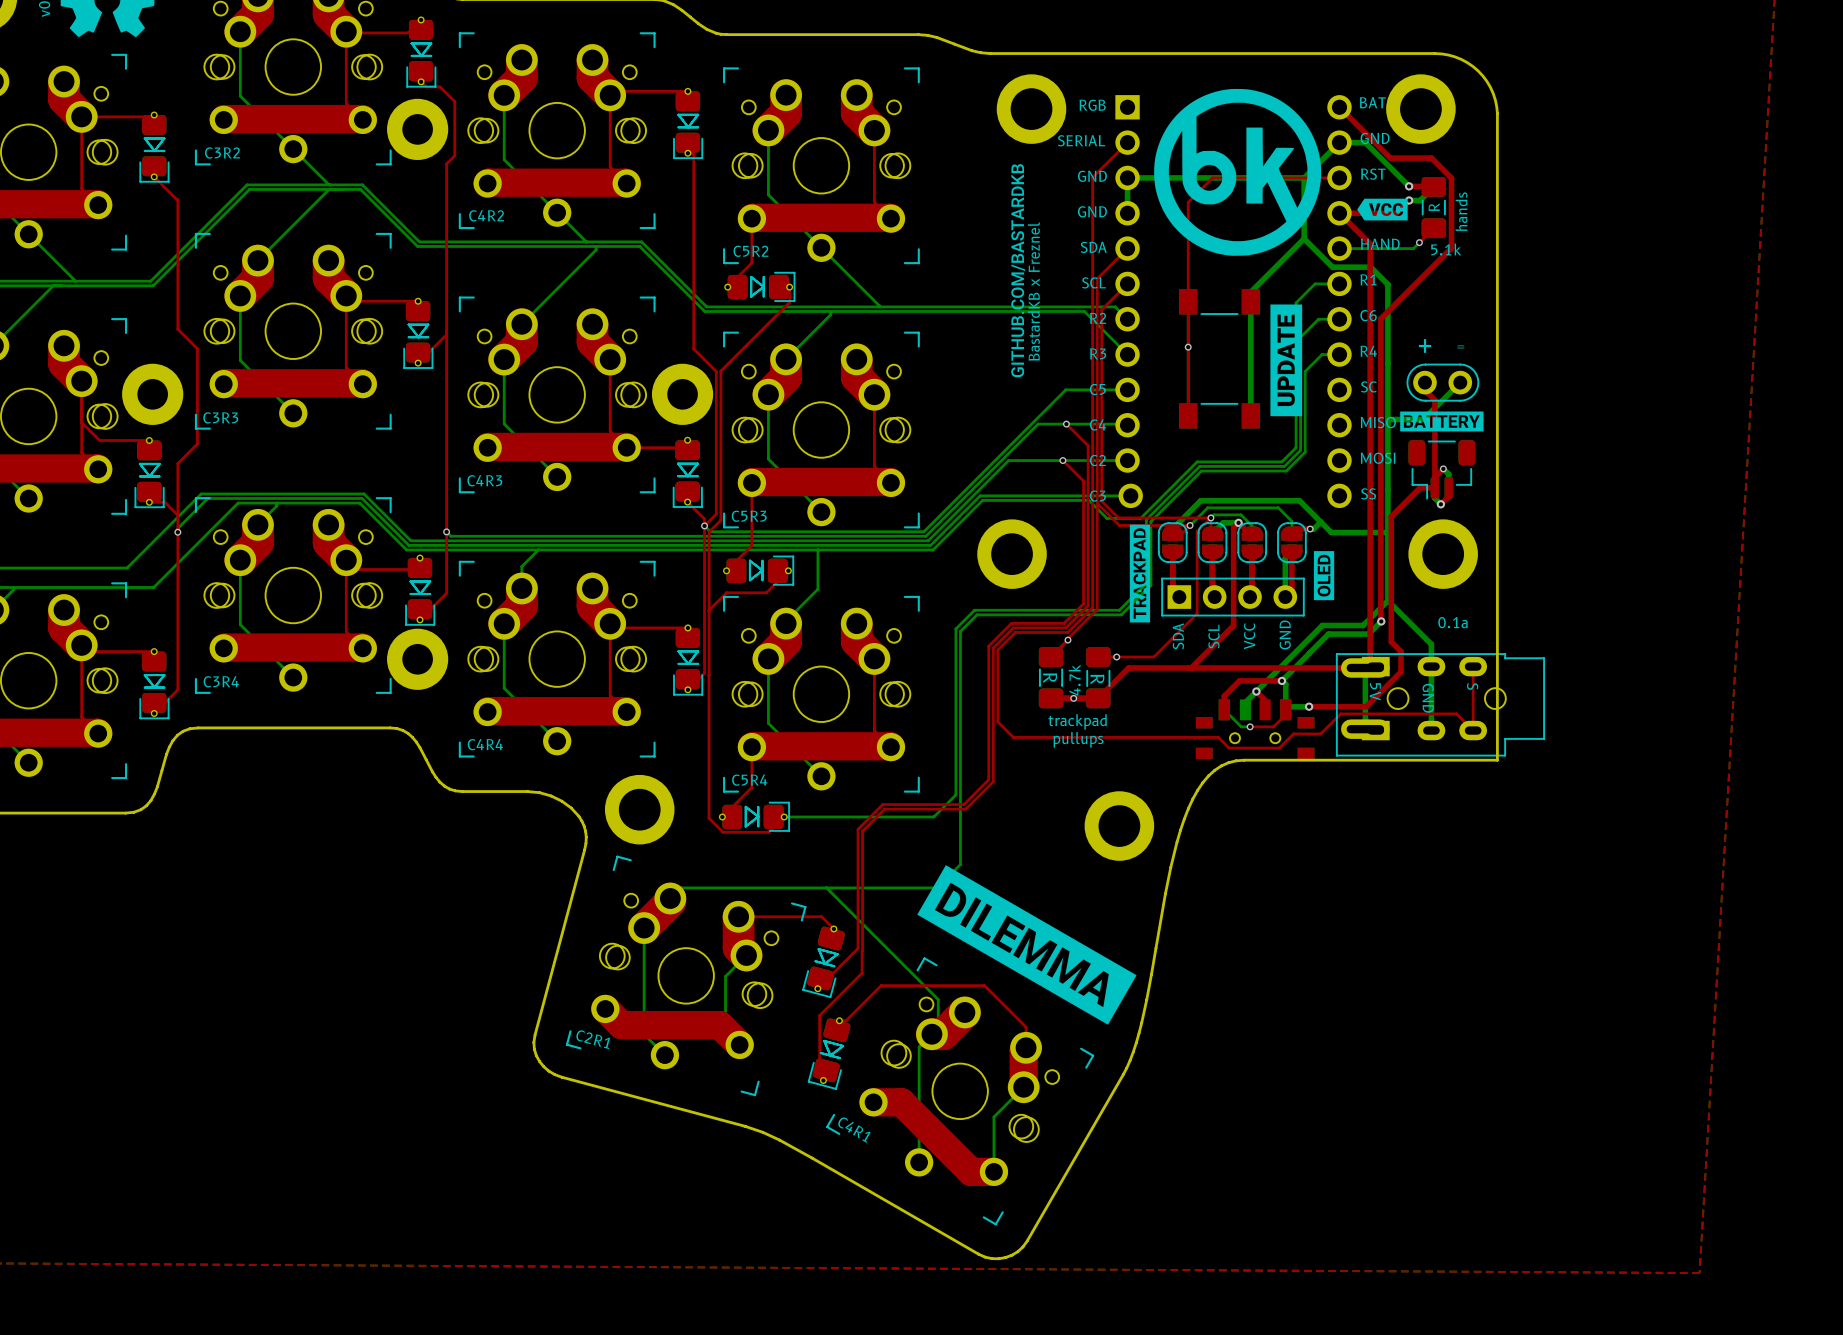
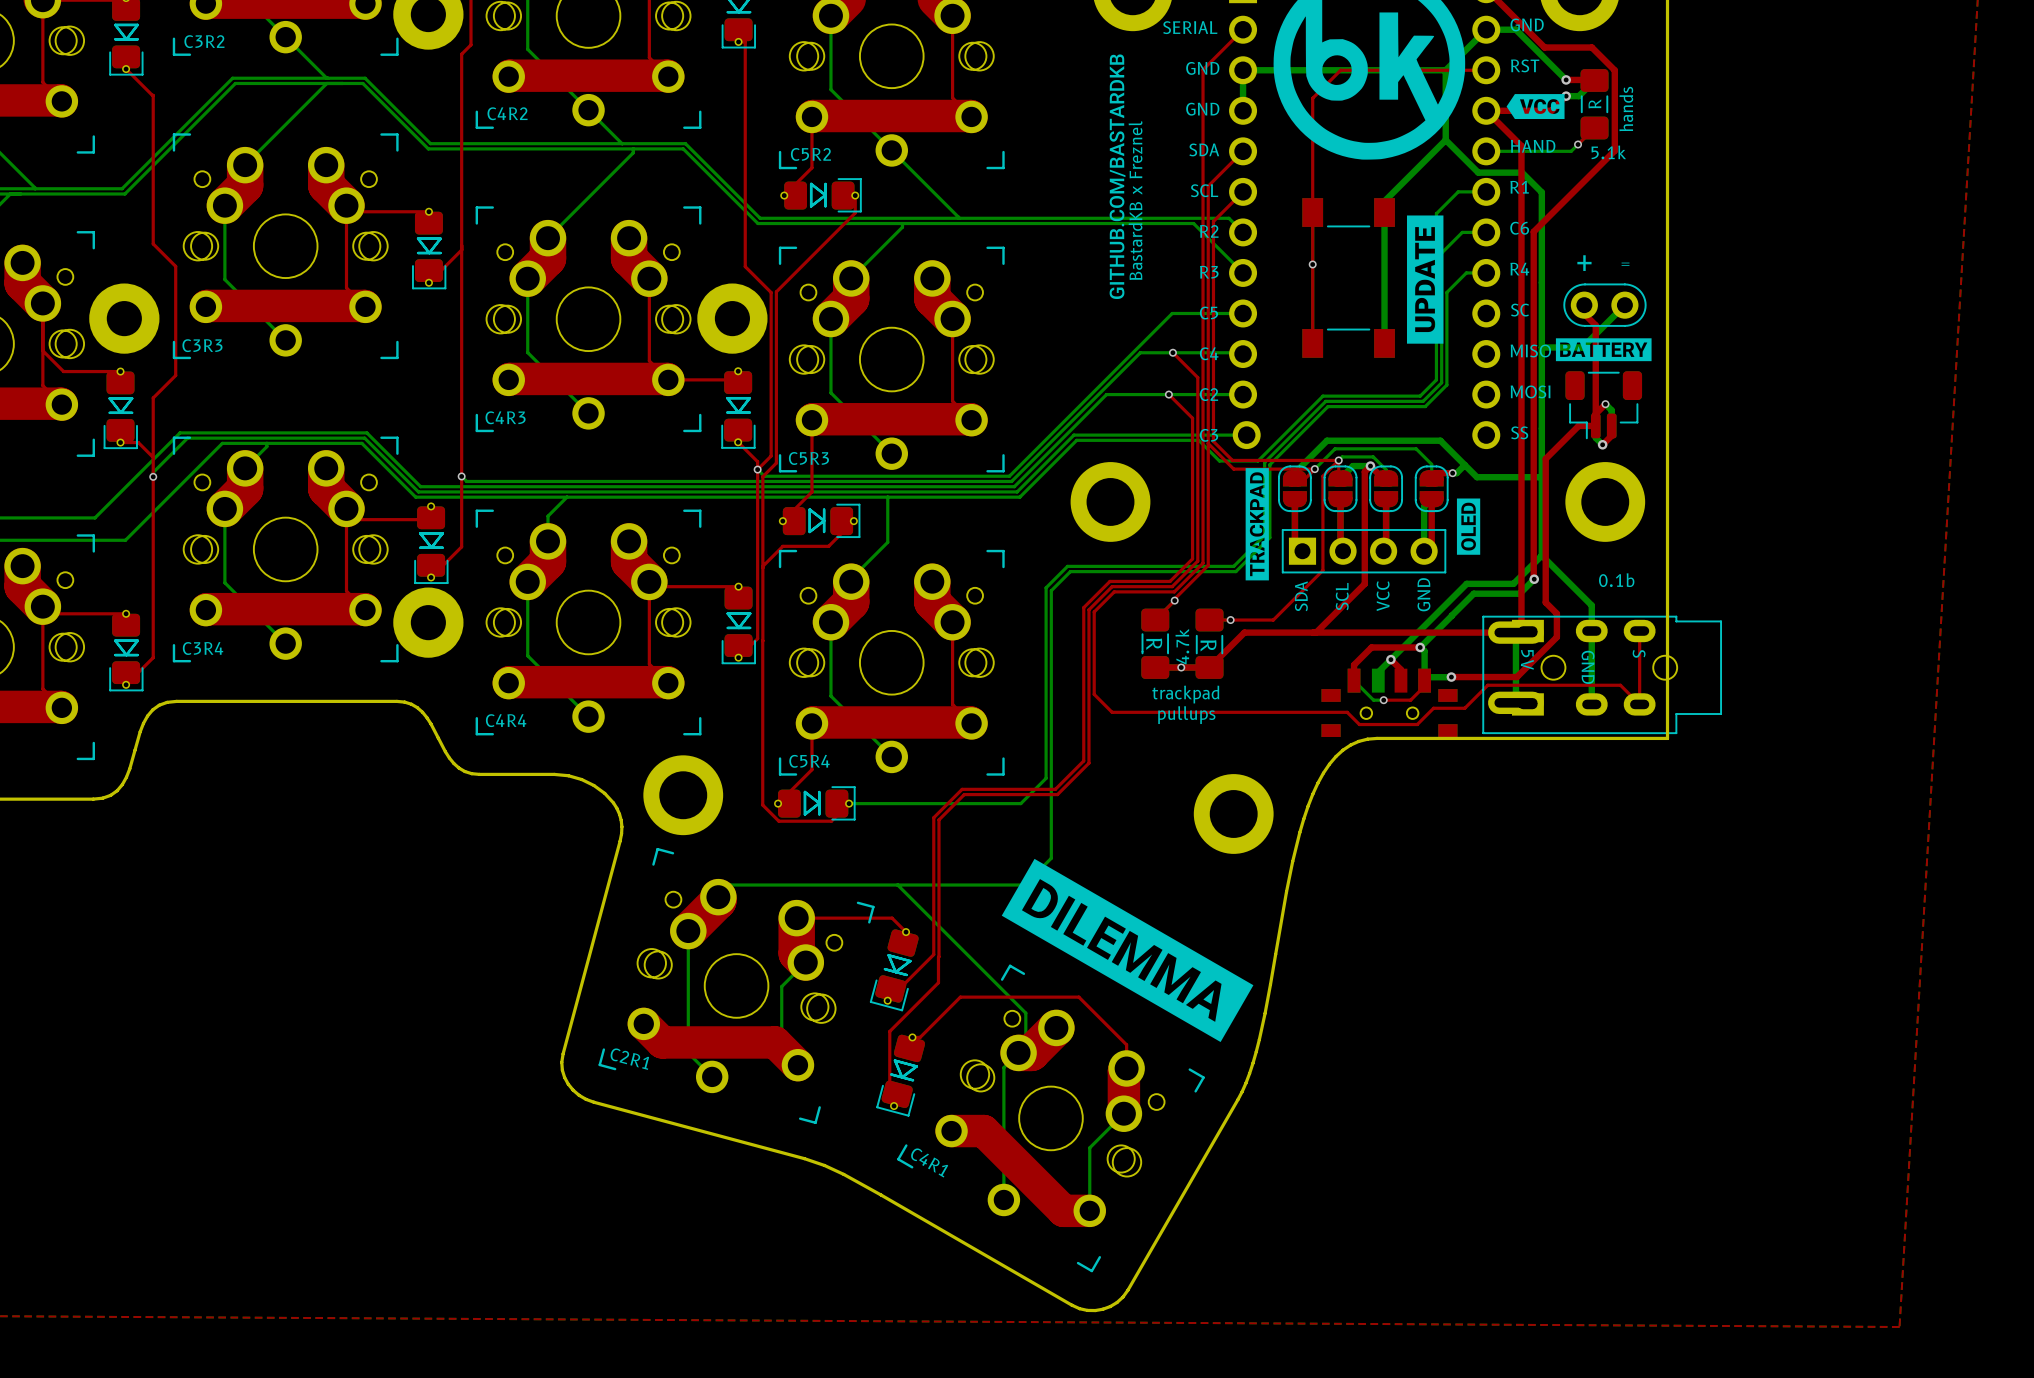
text: 0.1a (1453, 622) -> 0.1b (1616, 580)

